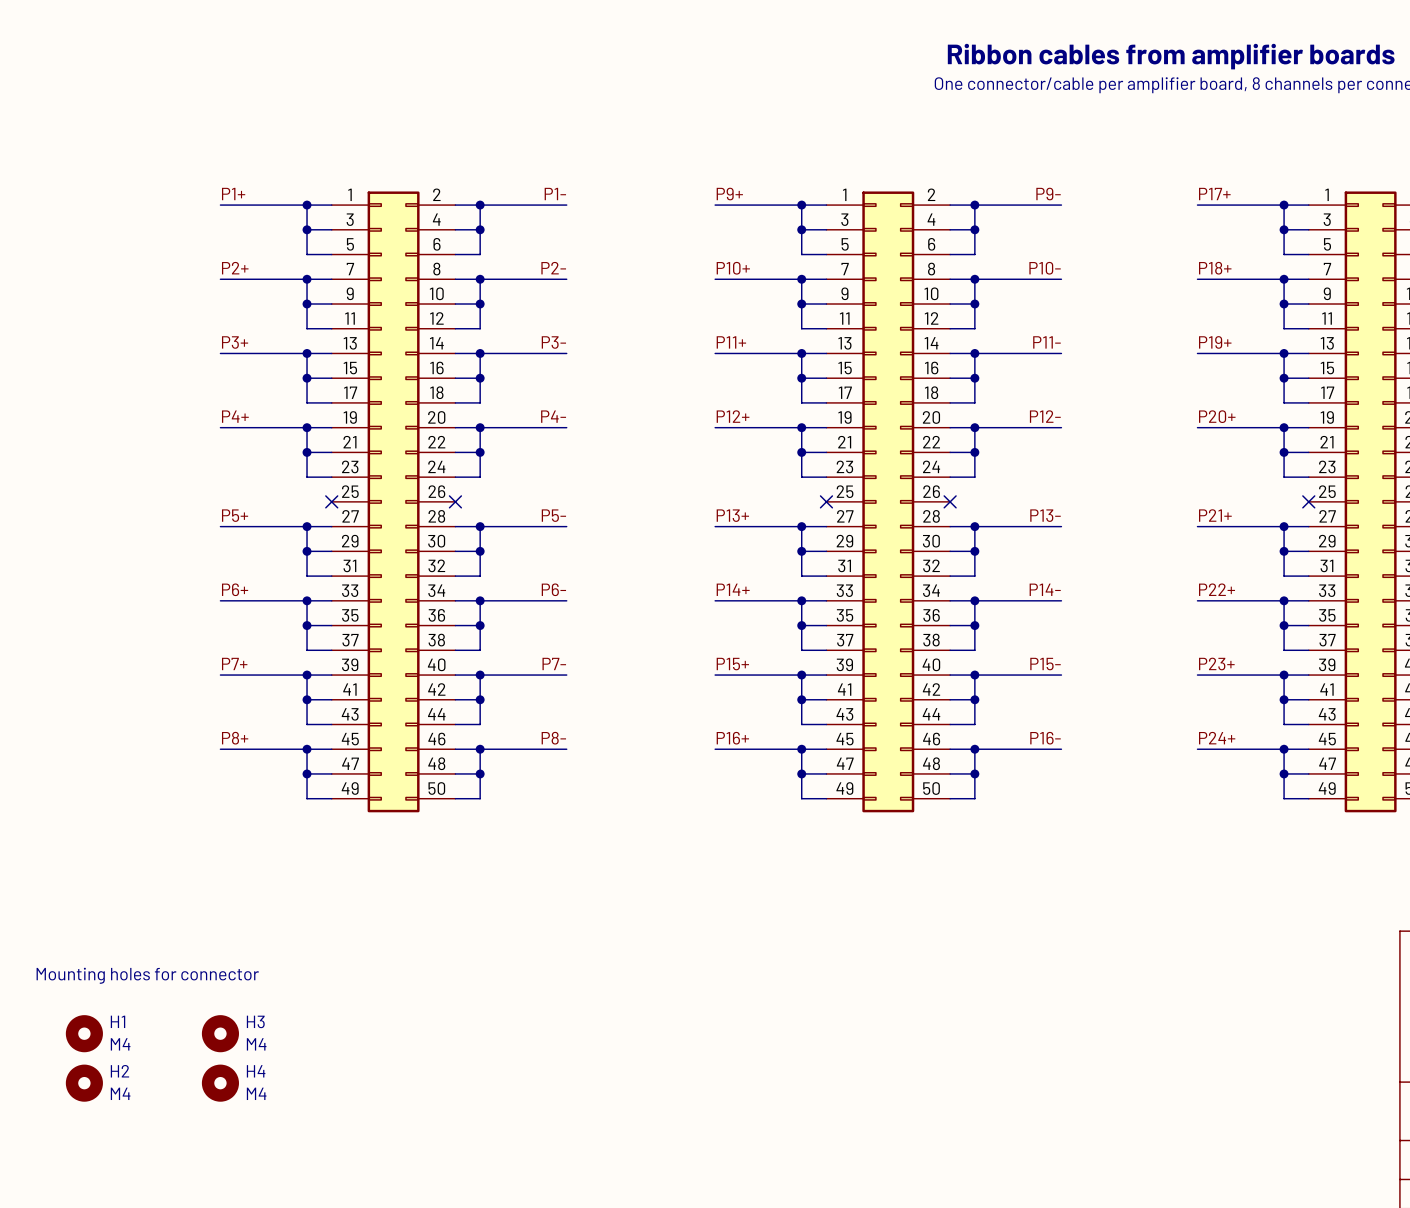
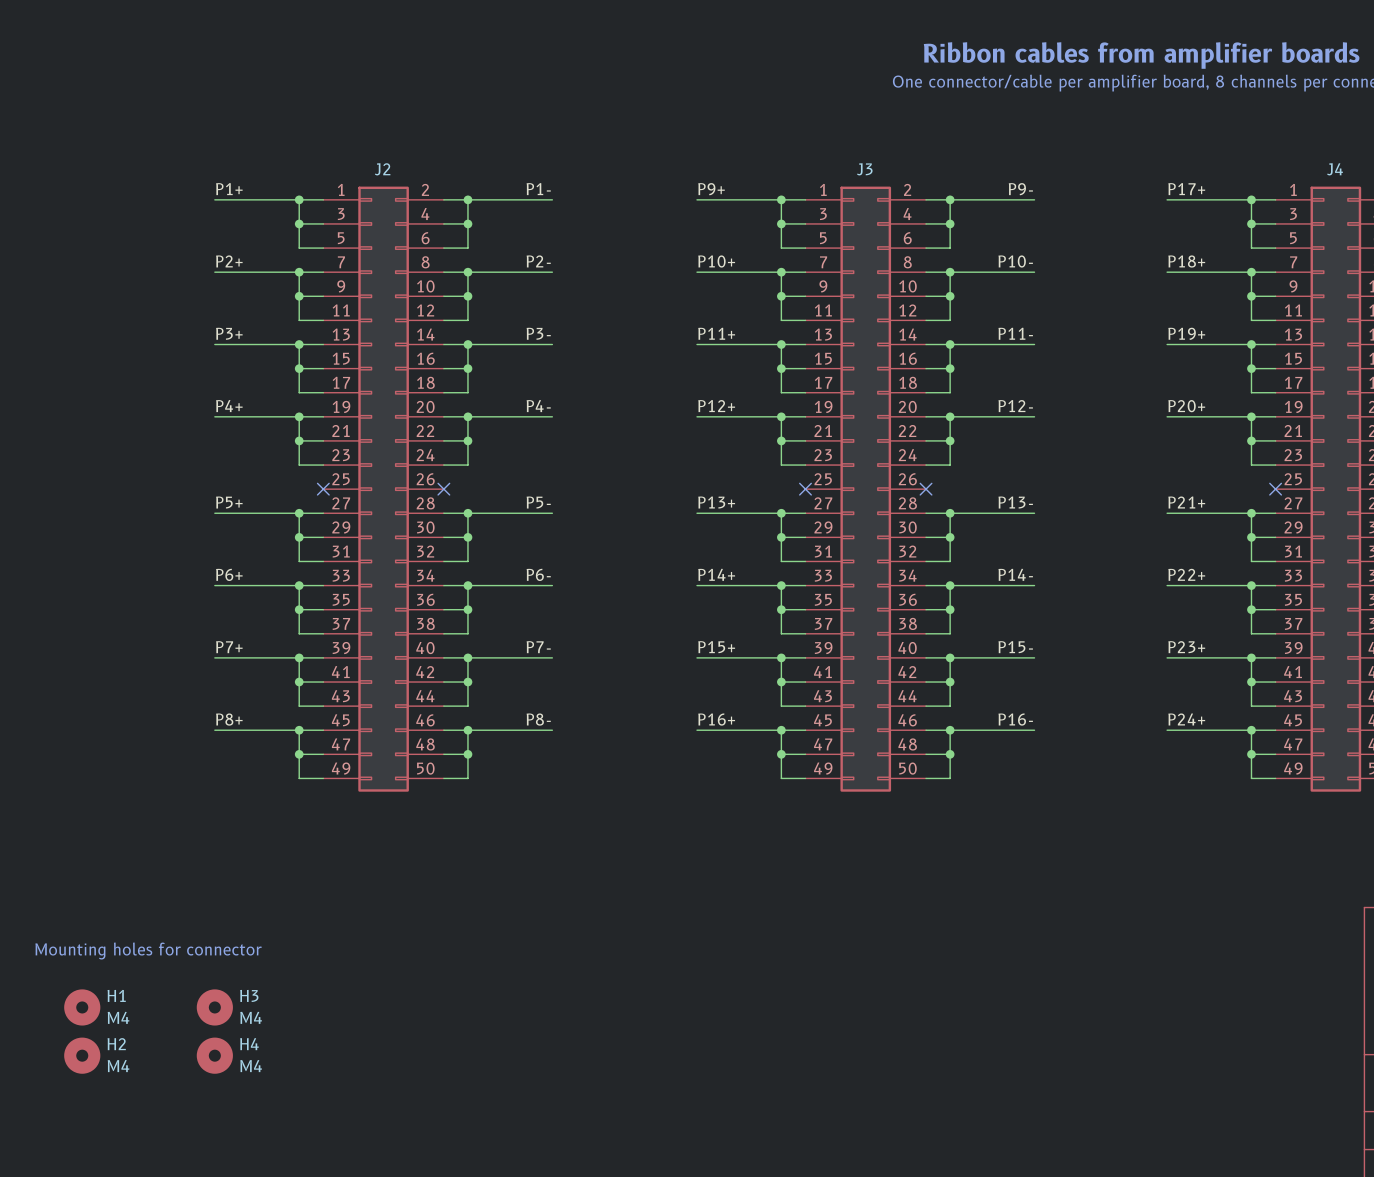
J2 name: none -> J2 (382, 169)
J3 name: none -> J3 (864, 169)
J4 name: none -> J4 (1335, 169)

